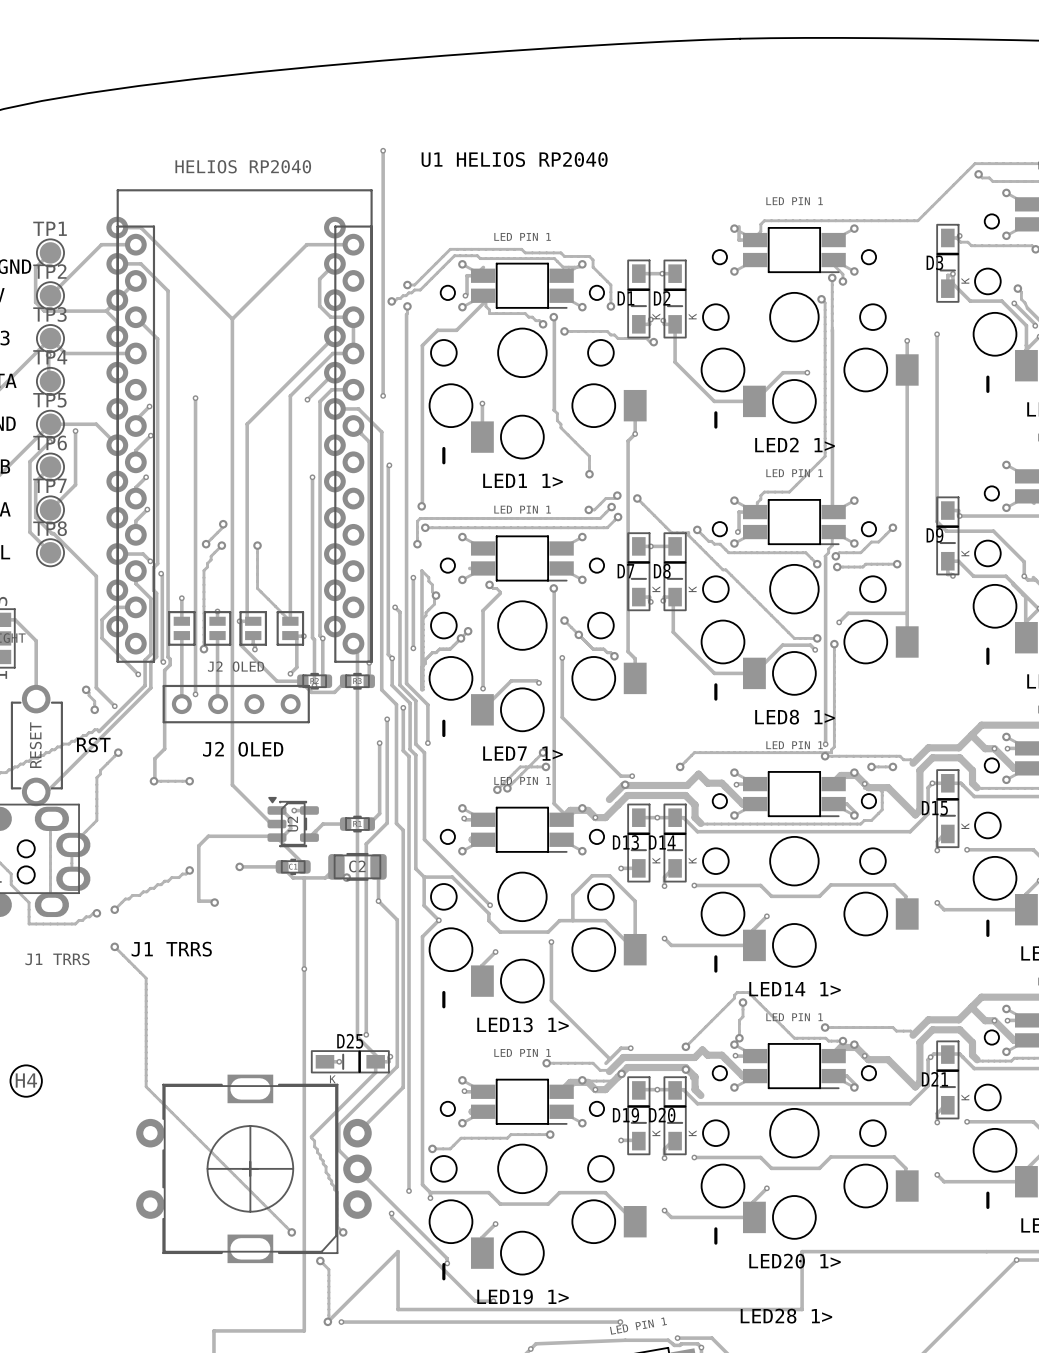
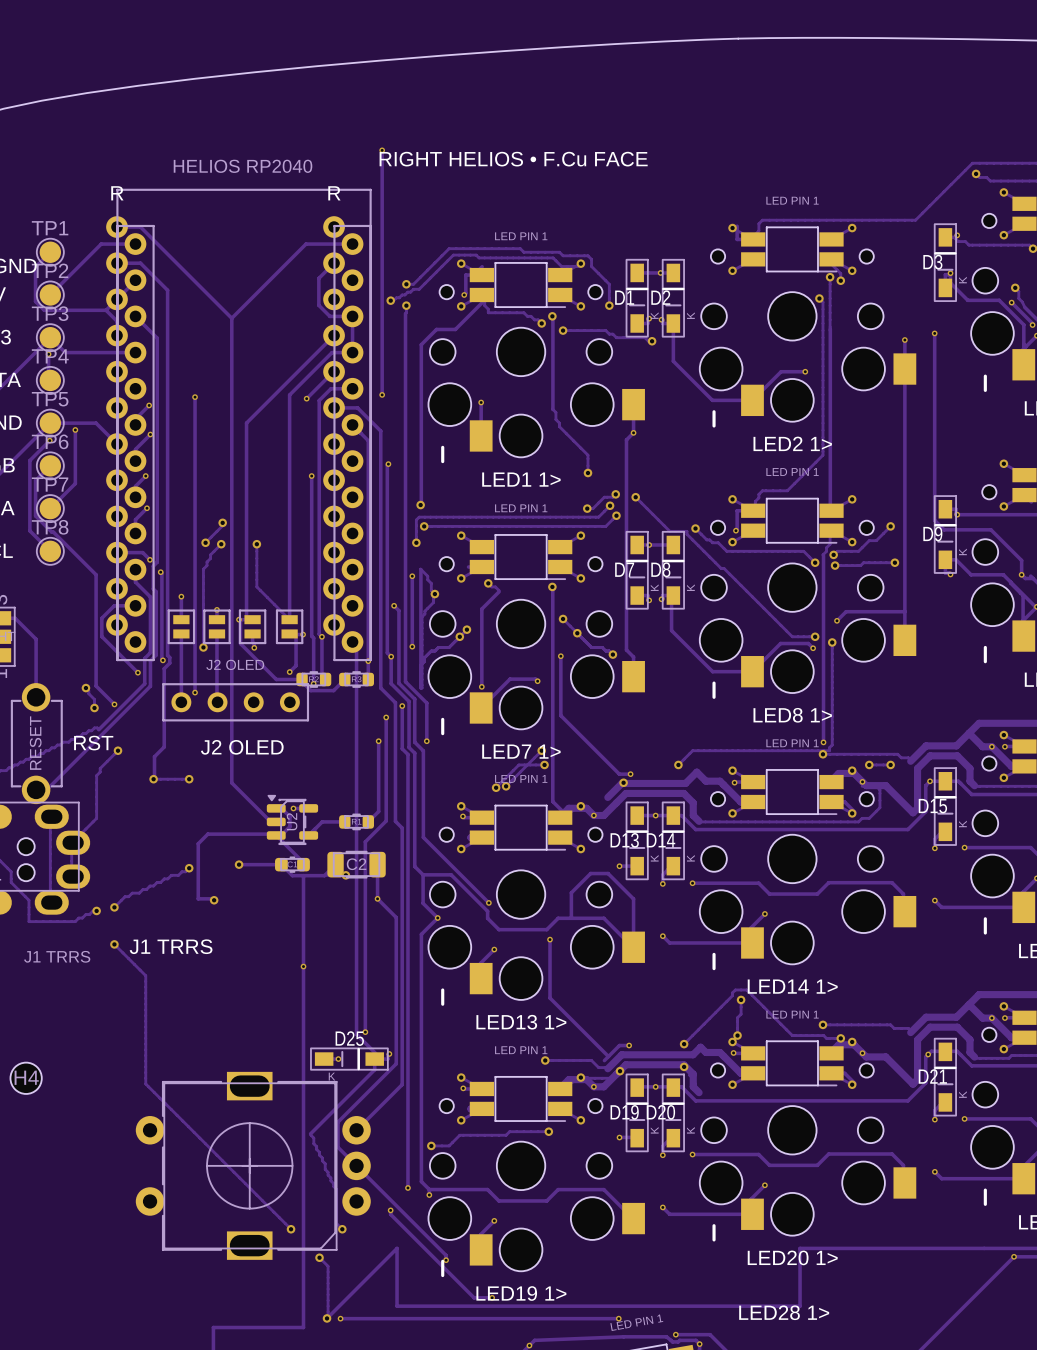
text: U1 HELIOS RP2040 (514, 159) -> RIGHT HELIOS • F.Cu FACE (513, 159)
text: none -> R (117, 193)
text: none -> R (334, 193)

